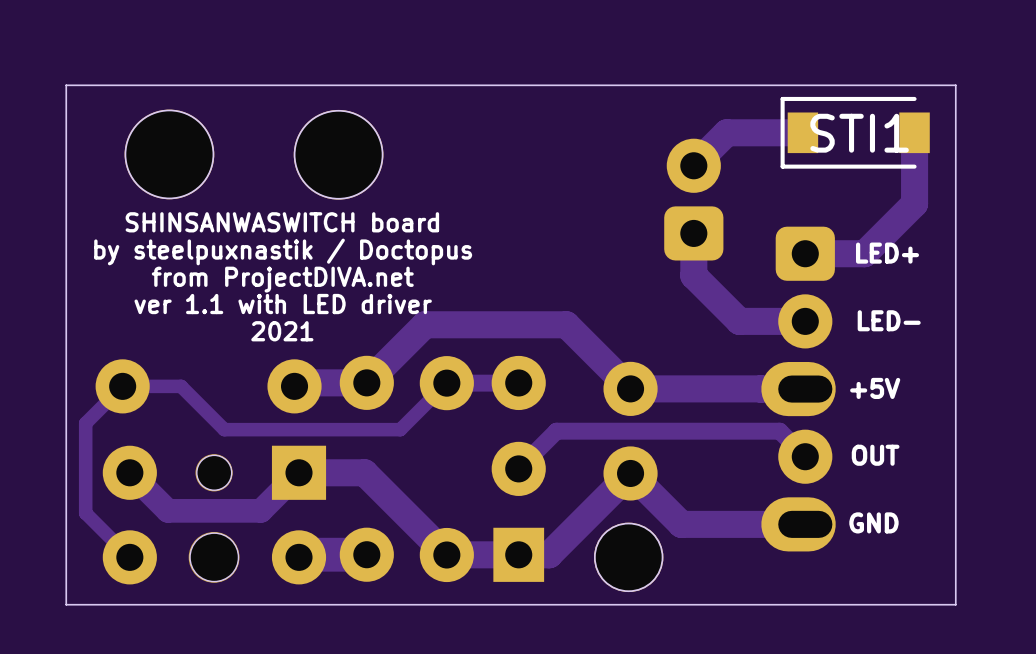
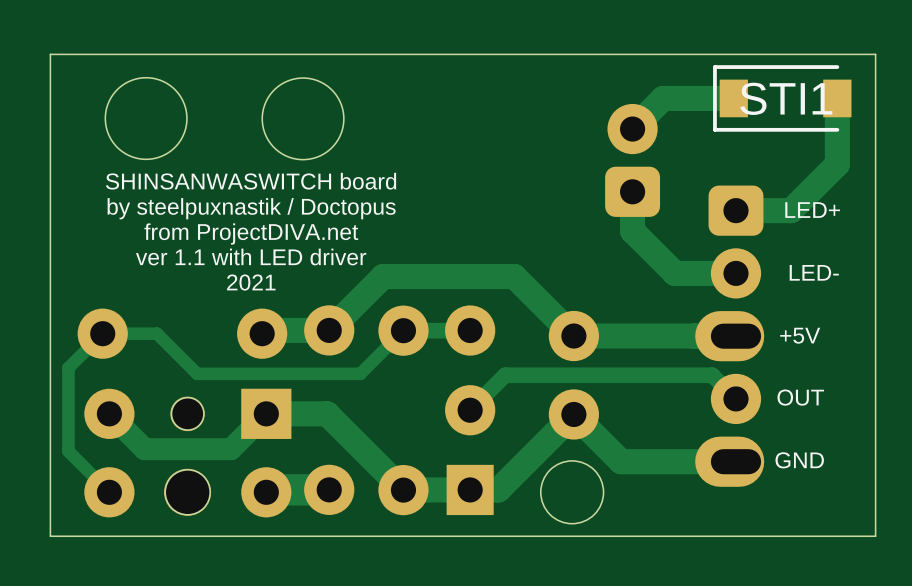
via: (169, 154) -> none
via: (338, 154) -> none
via: (628, 557) -> none

